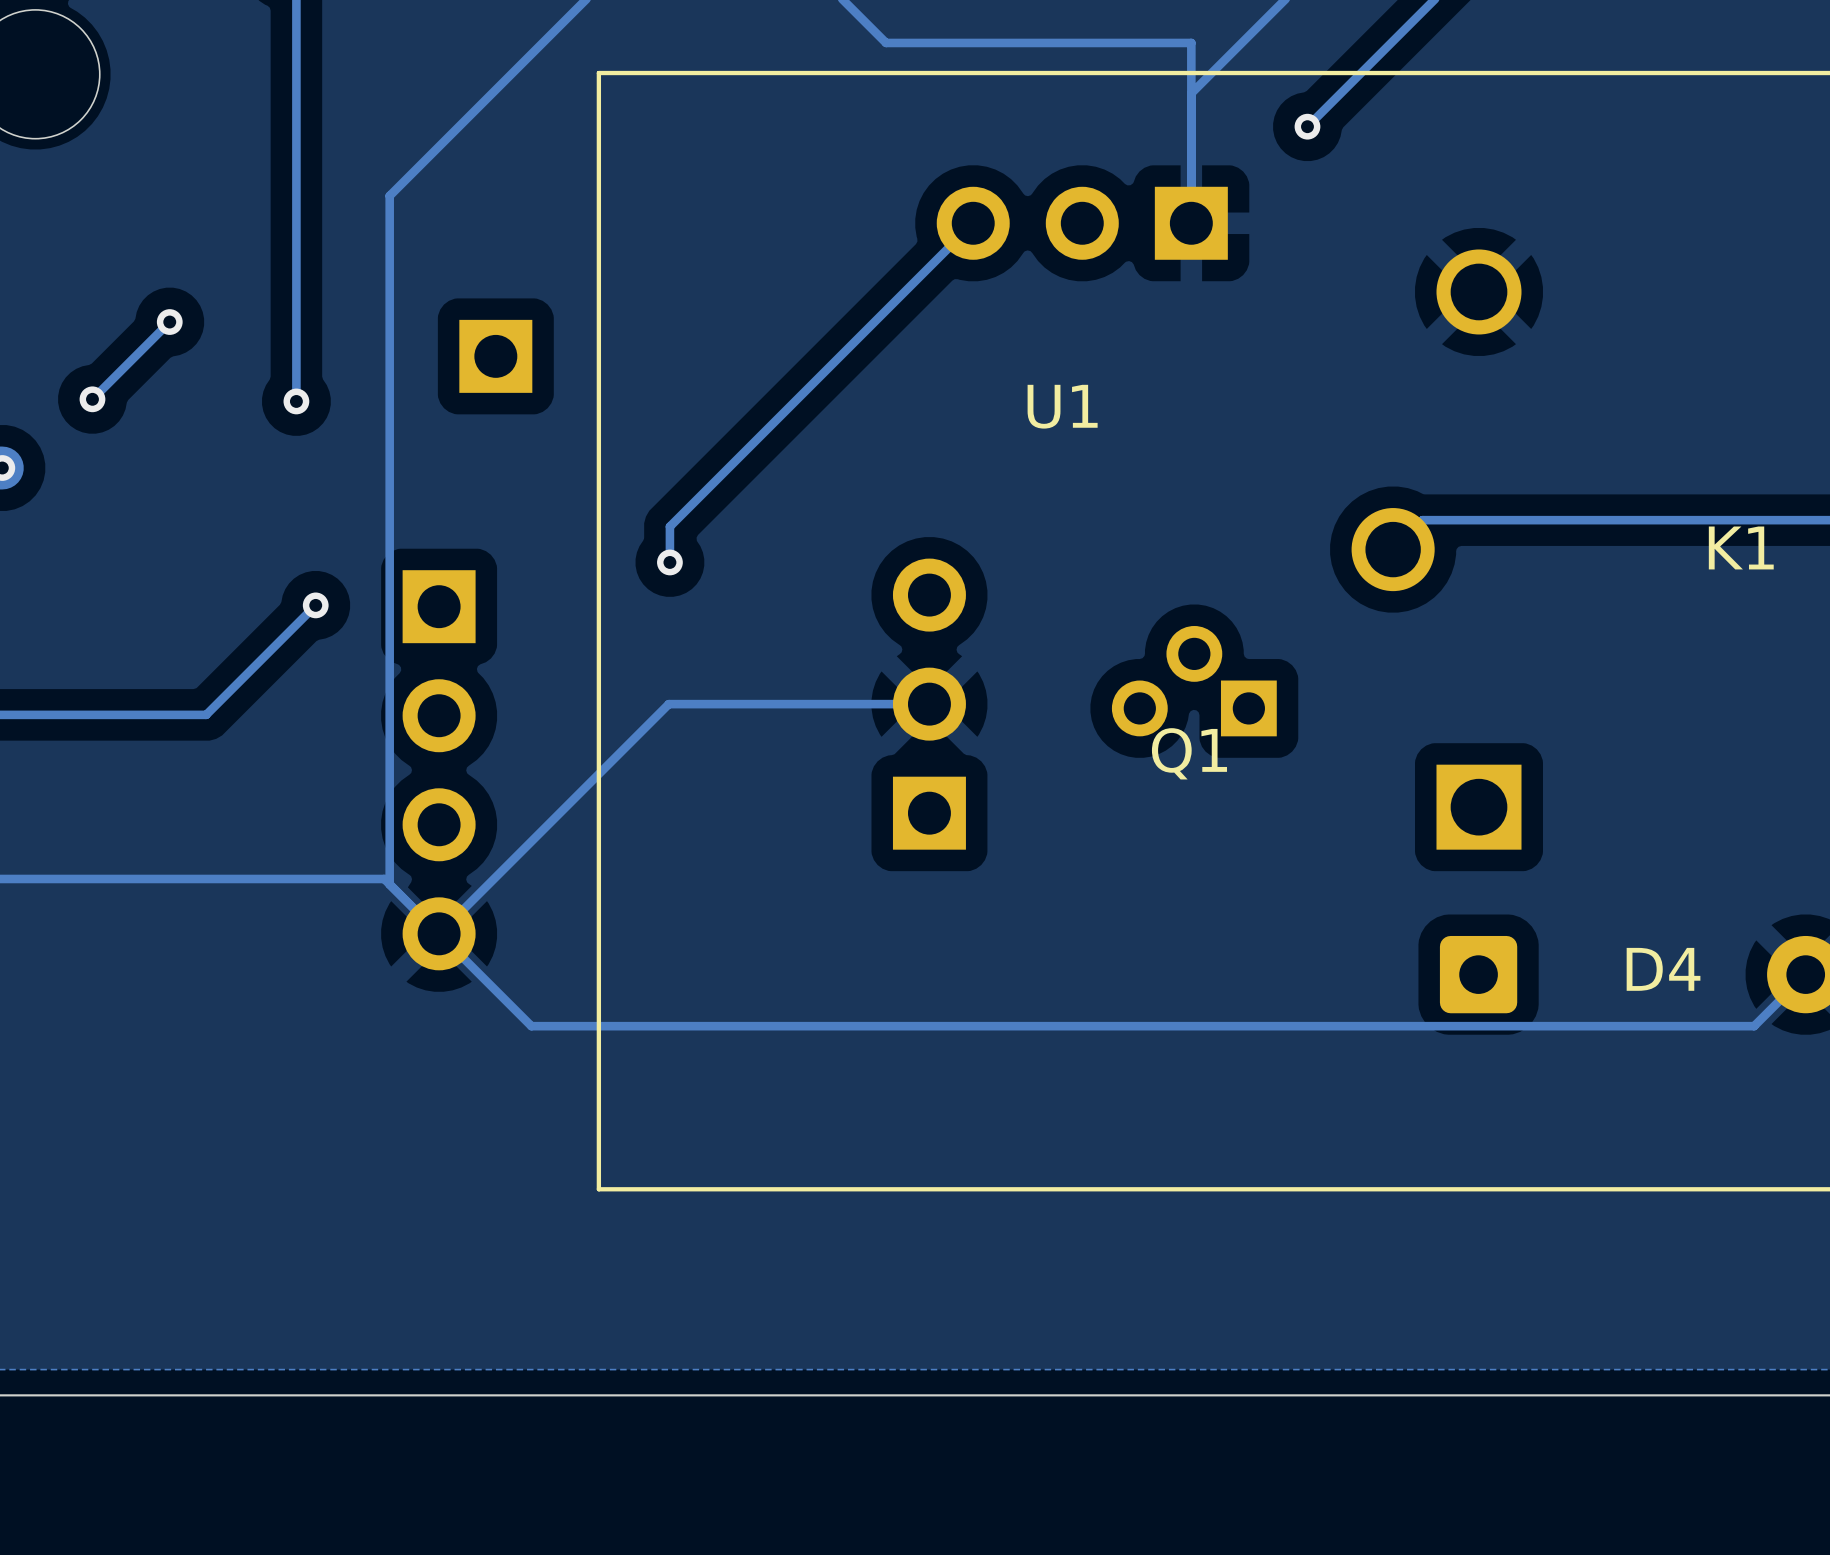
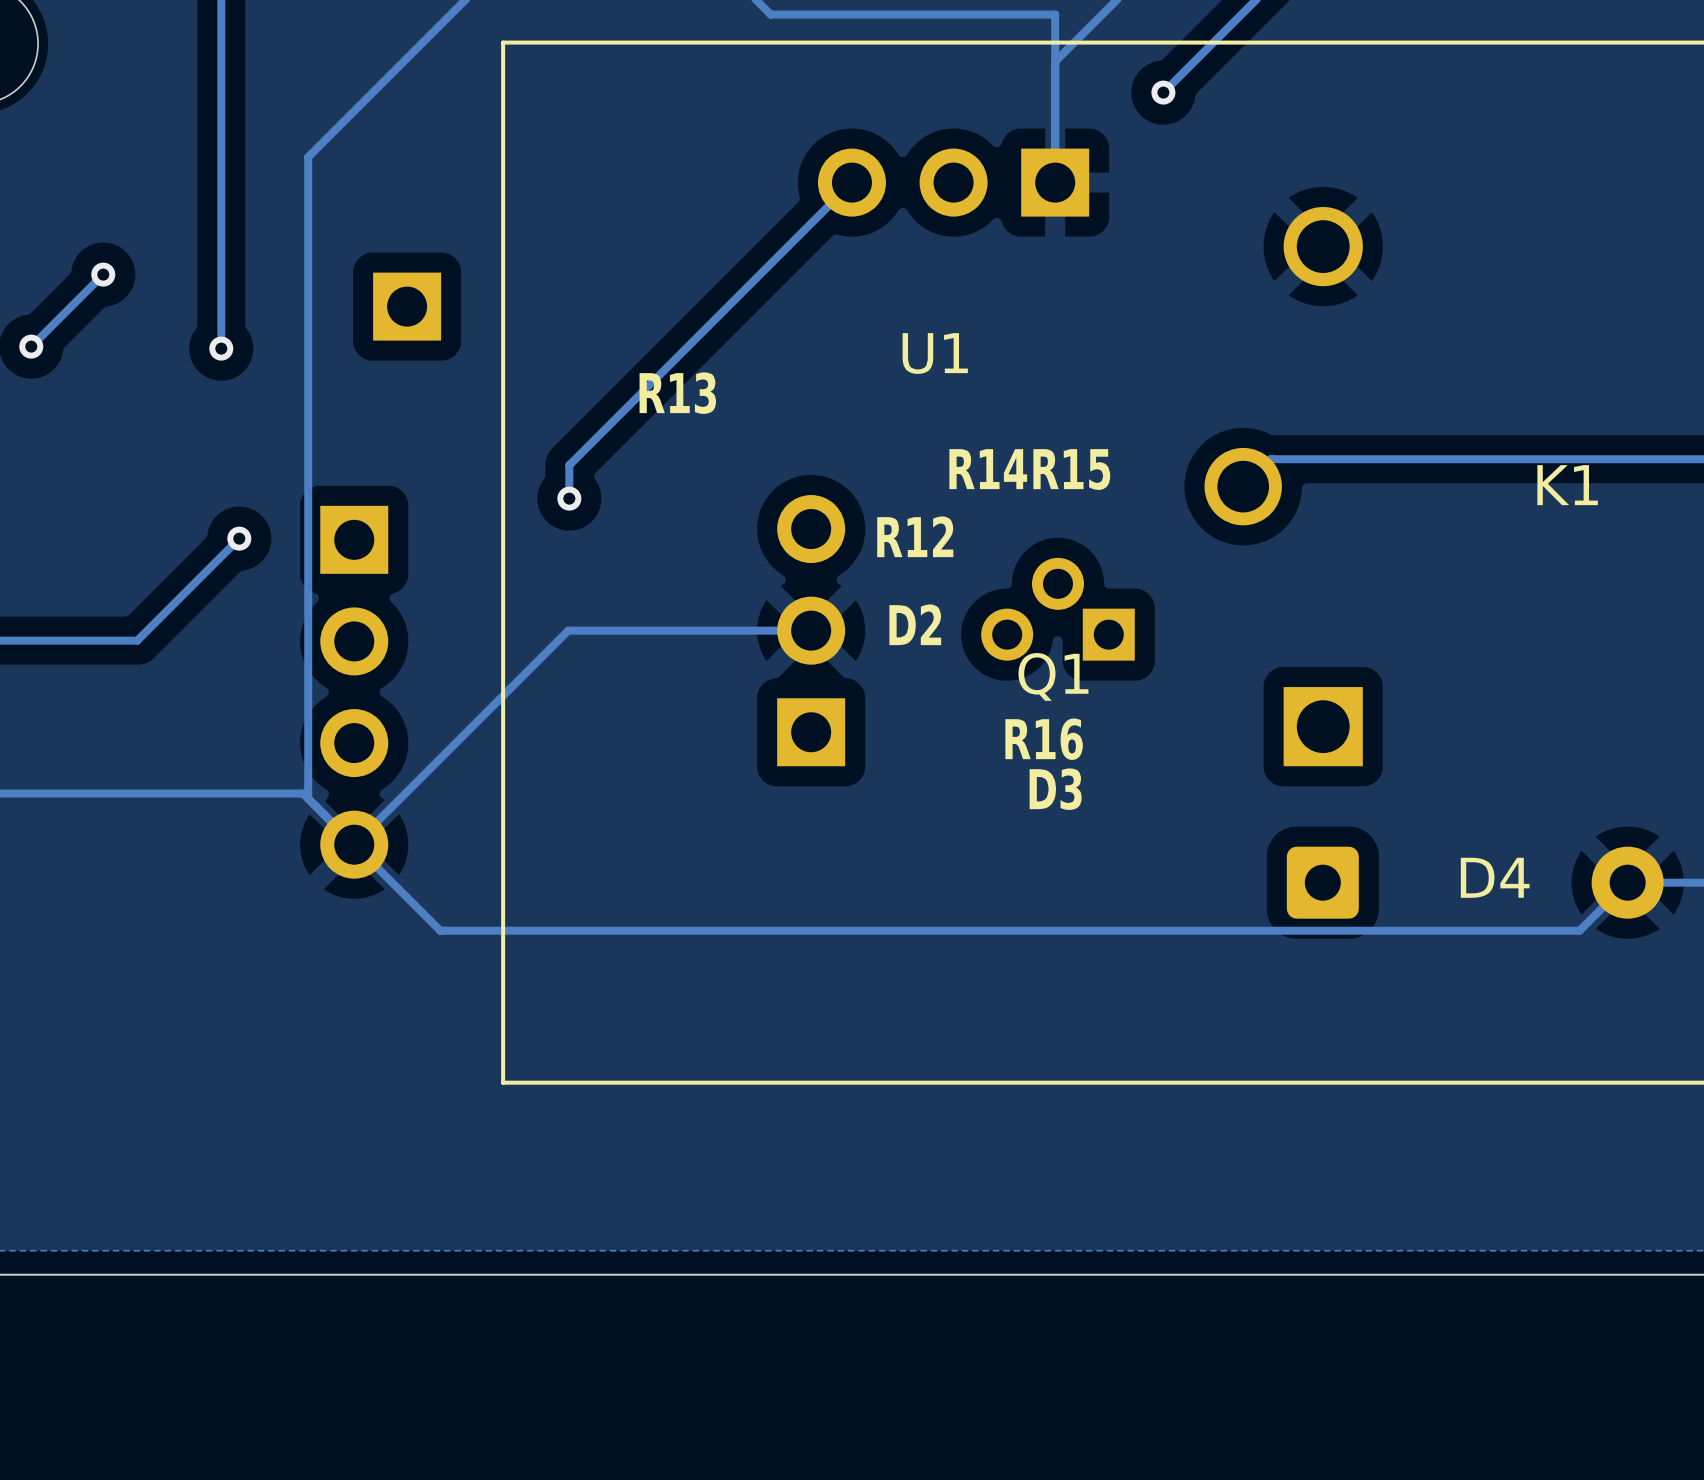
R13: none -> (677, 393)
R14: none -> (988, 469)
R15: none -> (1071, 469)
R12: none -> (915, 536)
D2: none -> (915, 624)
R16: none -> (1044, 739)
D3: none -> (1055, 789)

